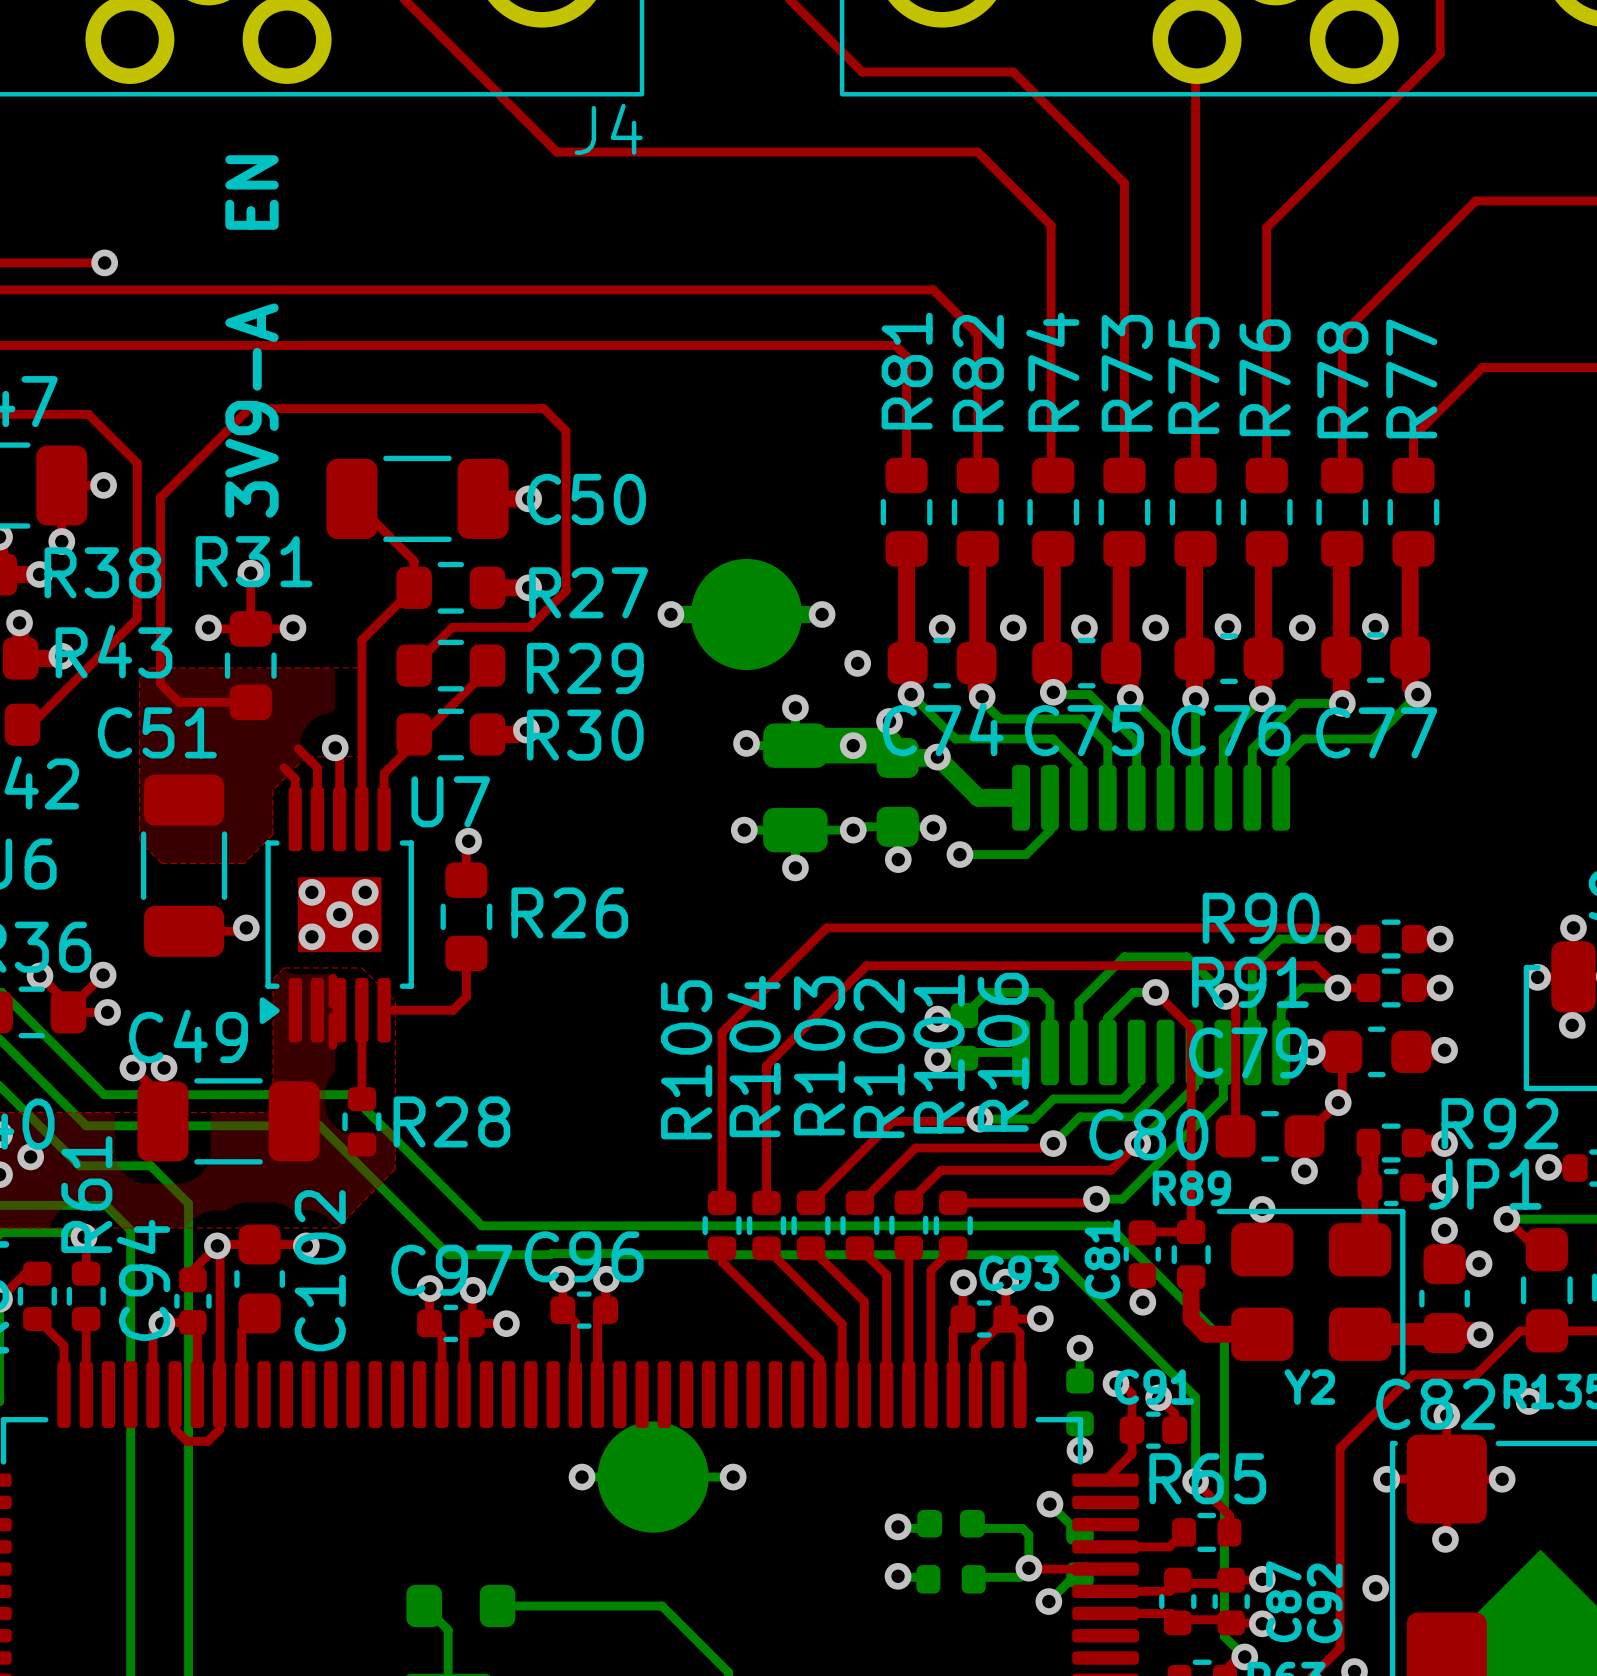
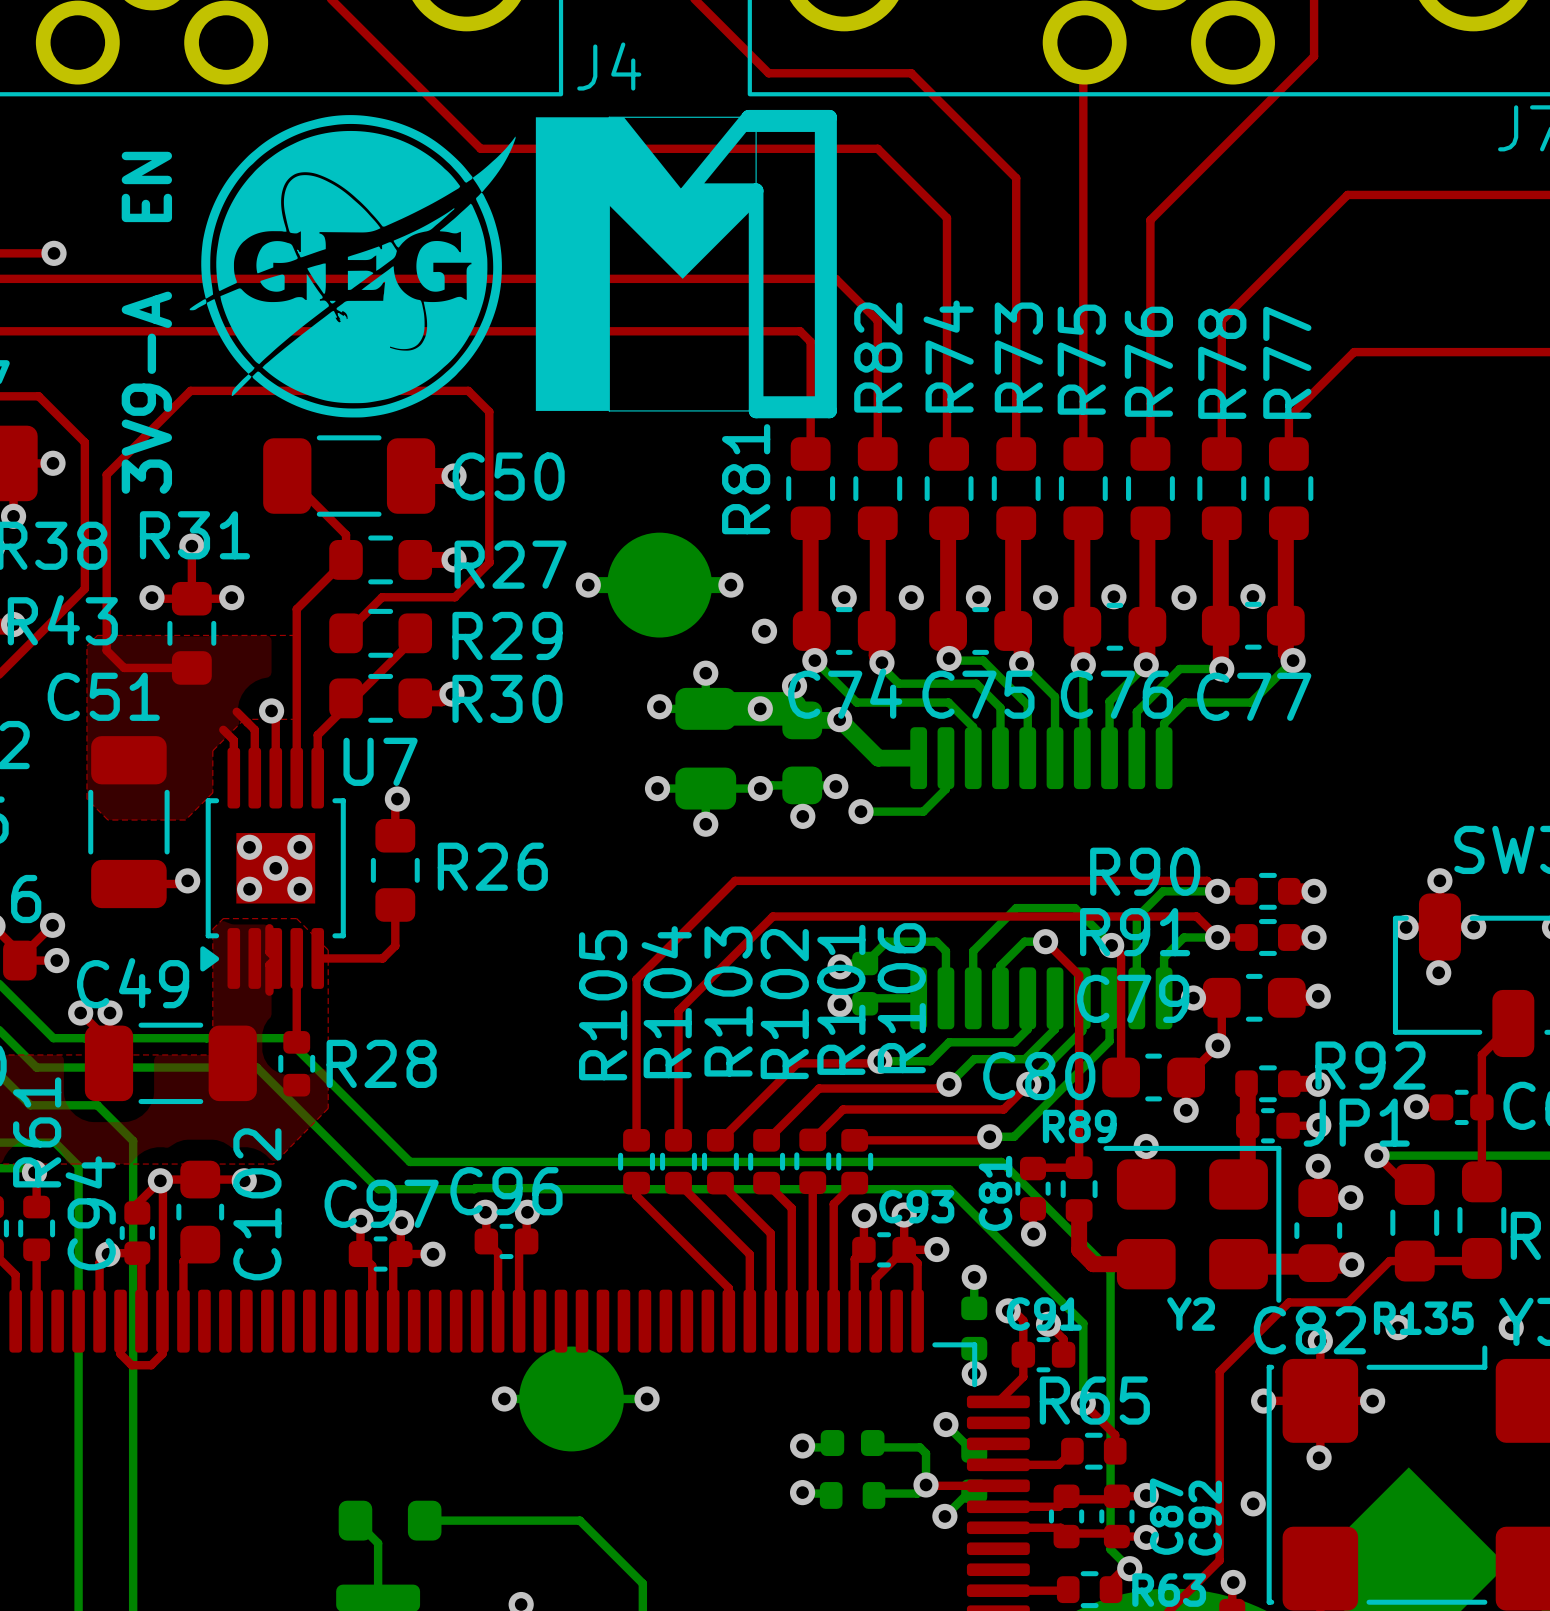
drawing: none -> [189, 115, 830, 418]
J4 name position: J4 (608, 129) -> J4 (609, 66)
text position: 3V9-A EN (251, 336) -> 3V9-A EN (146, 322)
R81 name position: R81 (907, 371) -> R81 (746, 479)
line: none -> (756, 410) (609, 410) (609, 117) (756, 117) (756, 410)
line: none -> (756, 410) (829, 410) (829, 117) (748, 117) (682, 198) (690, 190) (756, 190) (756, 410)

